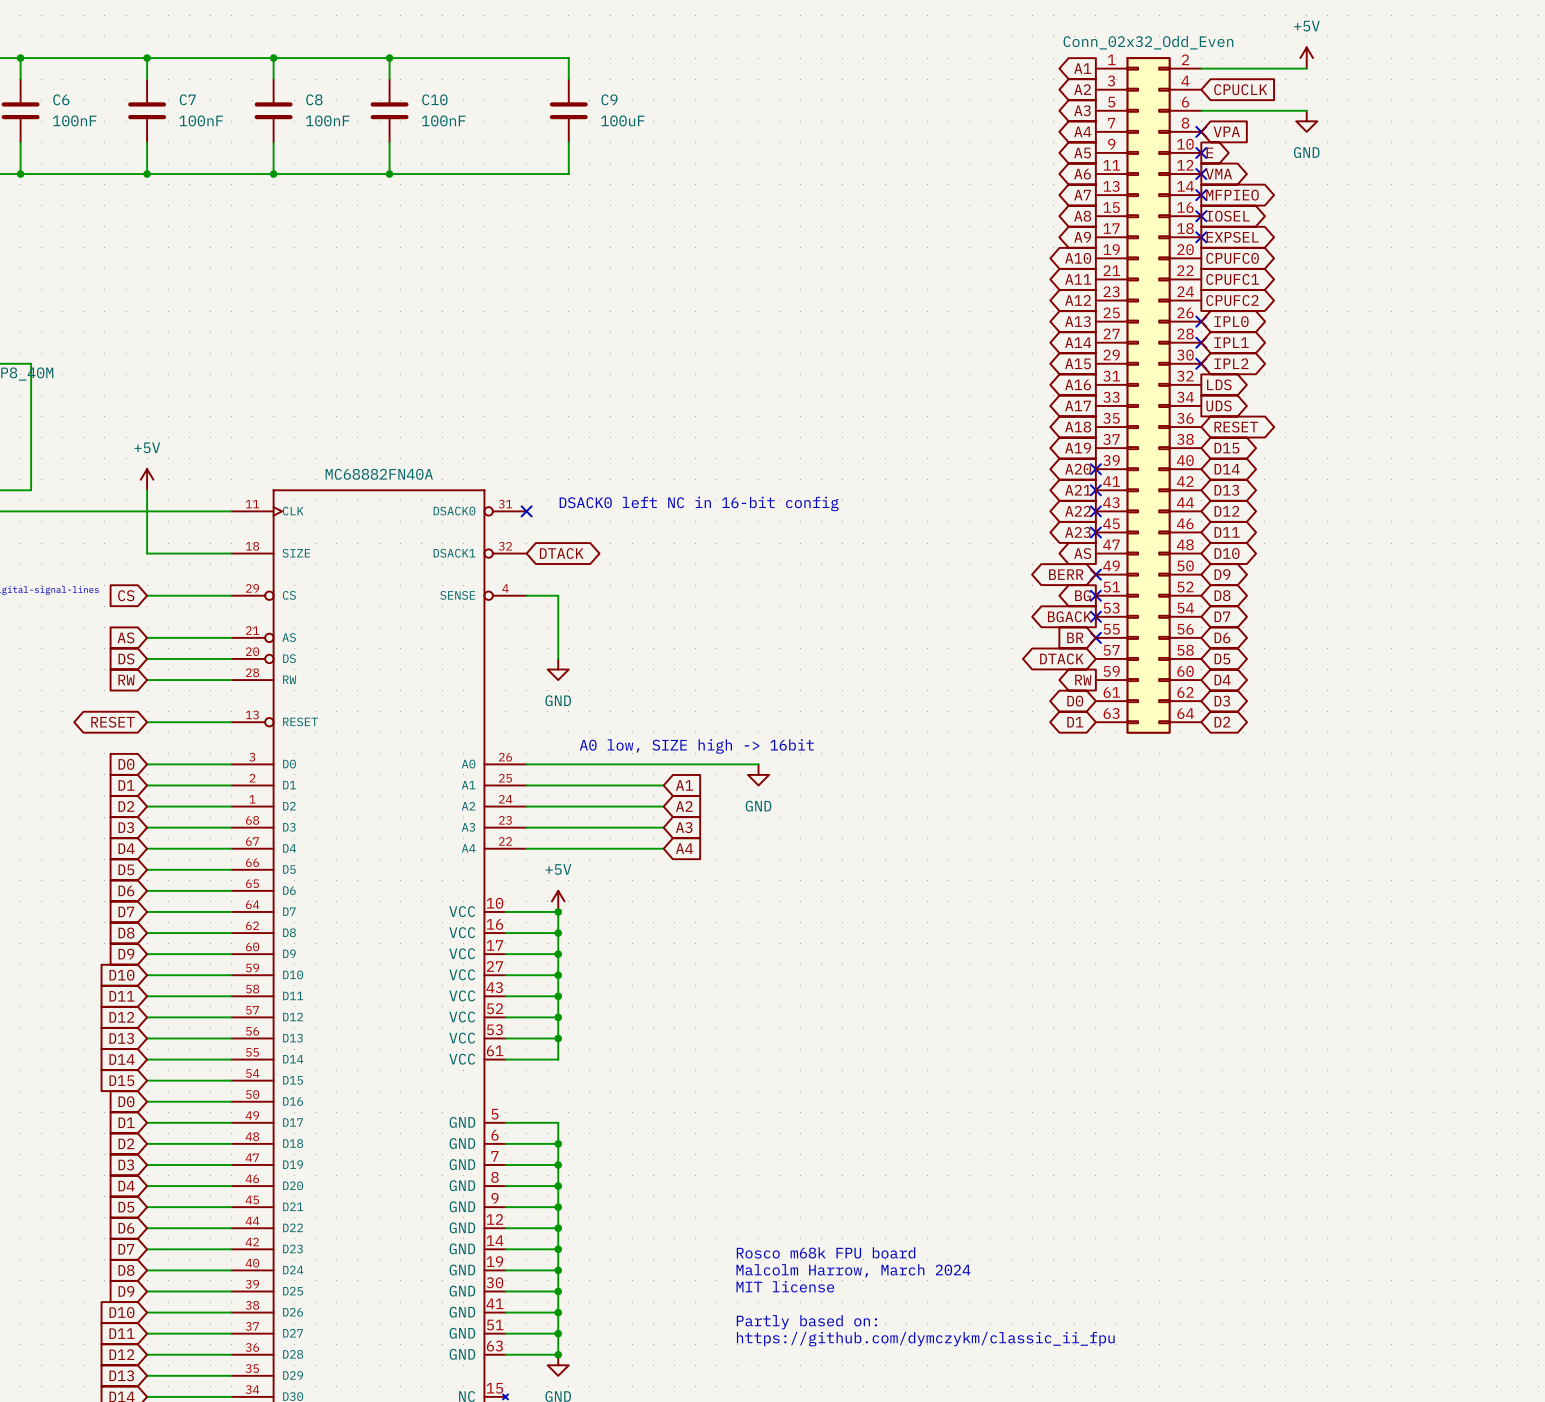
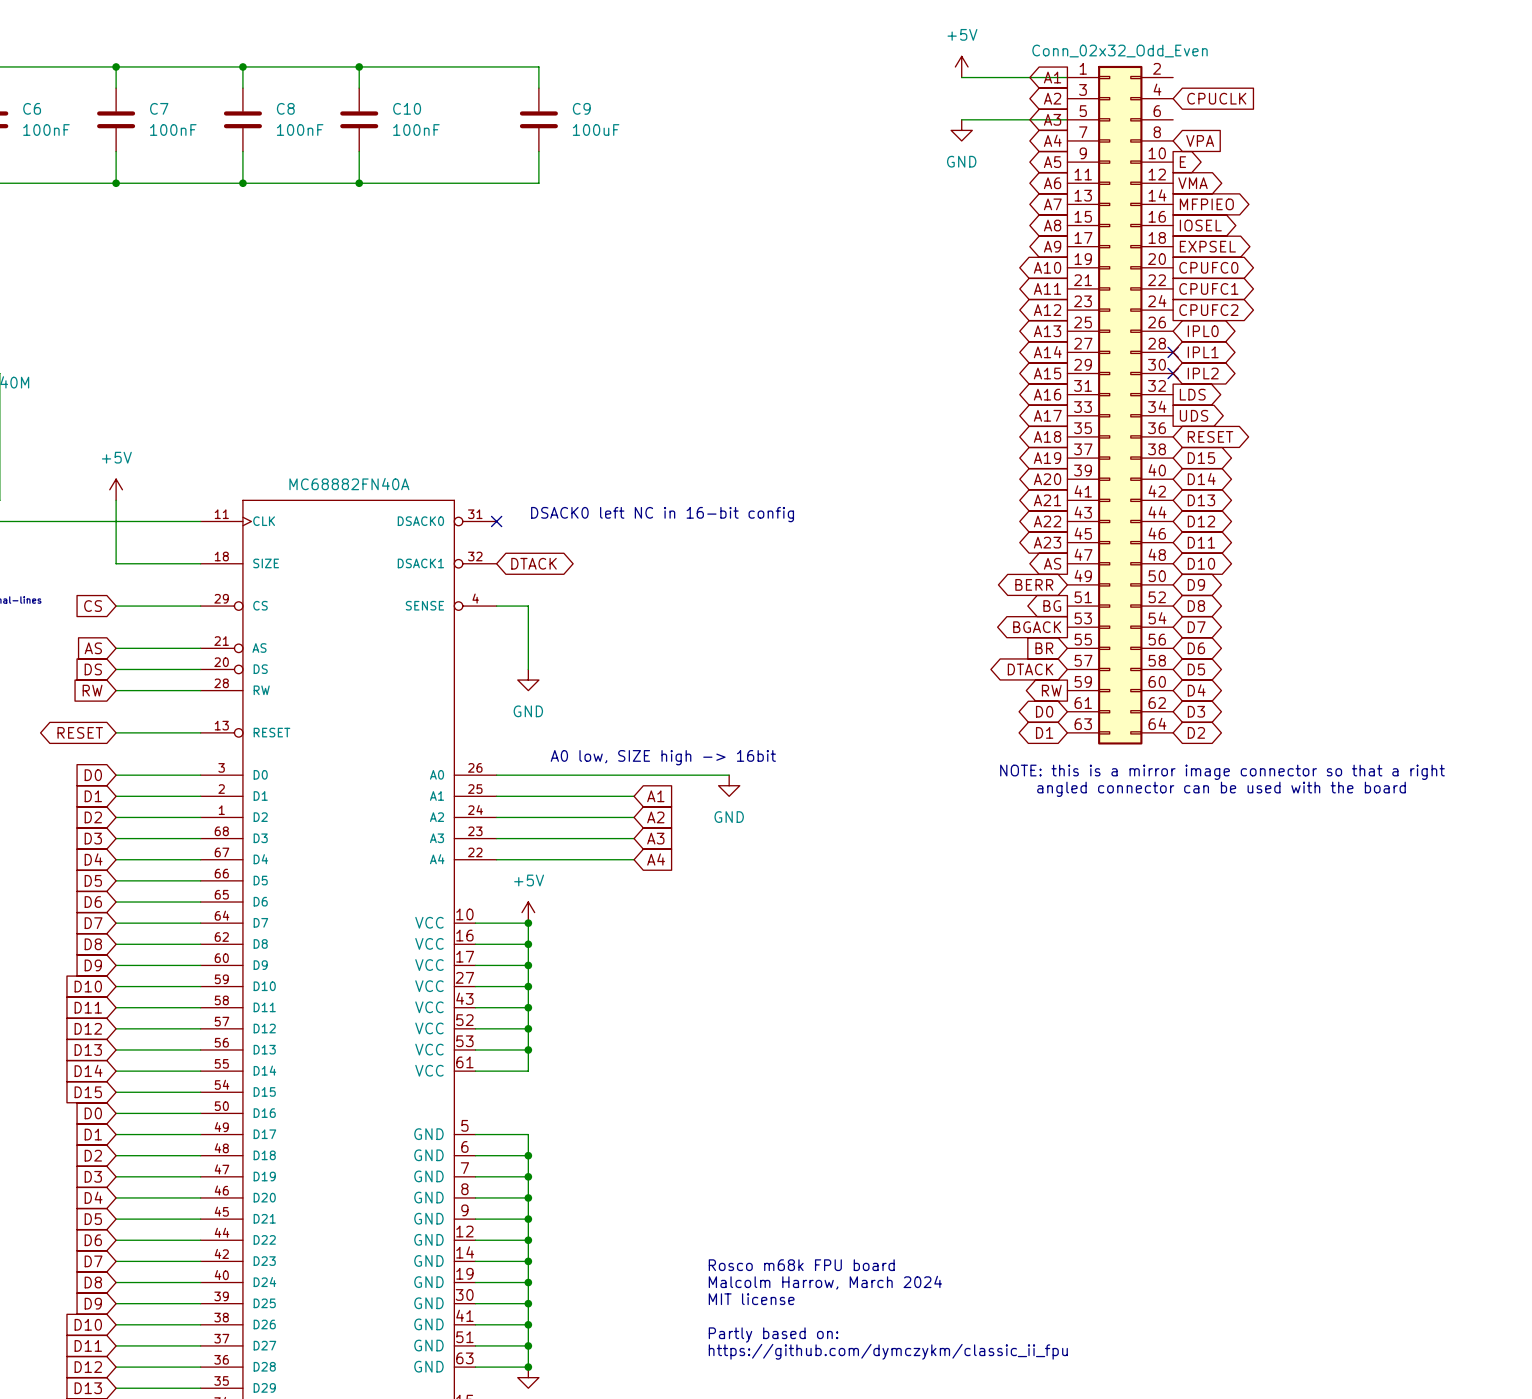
power symbol: none -> +5V (961, 66)
power symbol: +5V (1306, 58) -> none
wire: none -> (961, 77) (1067, 77)
wire: (1201, 68) (1306, 68) -> none
wire: none -> (961, 119) (1067, 119)
wire: (1201, 110) (1306, 110) -> none
power symbol: none -> GND (961, 130)
power symbol: GND (1306, 121) -> none
no-connect mark: (1201, 131) -> none
no-connect mark: (1201, 152) -> none
no-connect mark: (1201, 174) -> none
no-connect mark: (1201, 195) -> none
no-connect mark: (1201, 216) -> none
no-connect mark: (1201, 237) -> none
no-connect mark: (1201, 321) -> none
no-connect mark: (1095, 469) -> none
no-connect mark: (1095, 490) -> none
no-connect mark: (1095, 511) -> none
no-connect mark: (1095, 532) -> none
no-connect mark: (1095, 574) -> none
no-connect mark: (1095, 595) -> none
no-connect mark: (1095, 616) -> none
no-connect mark: (1095, 637) -> none
text: none -> NOTE: this is a mirror image connector so that a right (1222, 772)
text: none -> angled connector can be used with the board (1221, 789)

